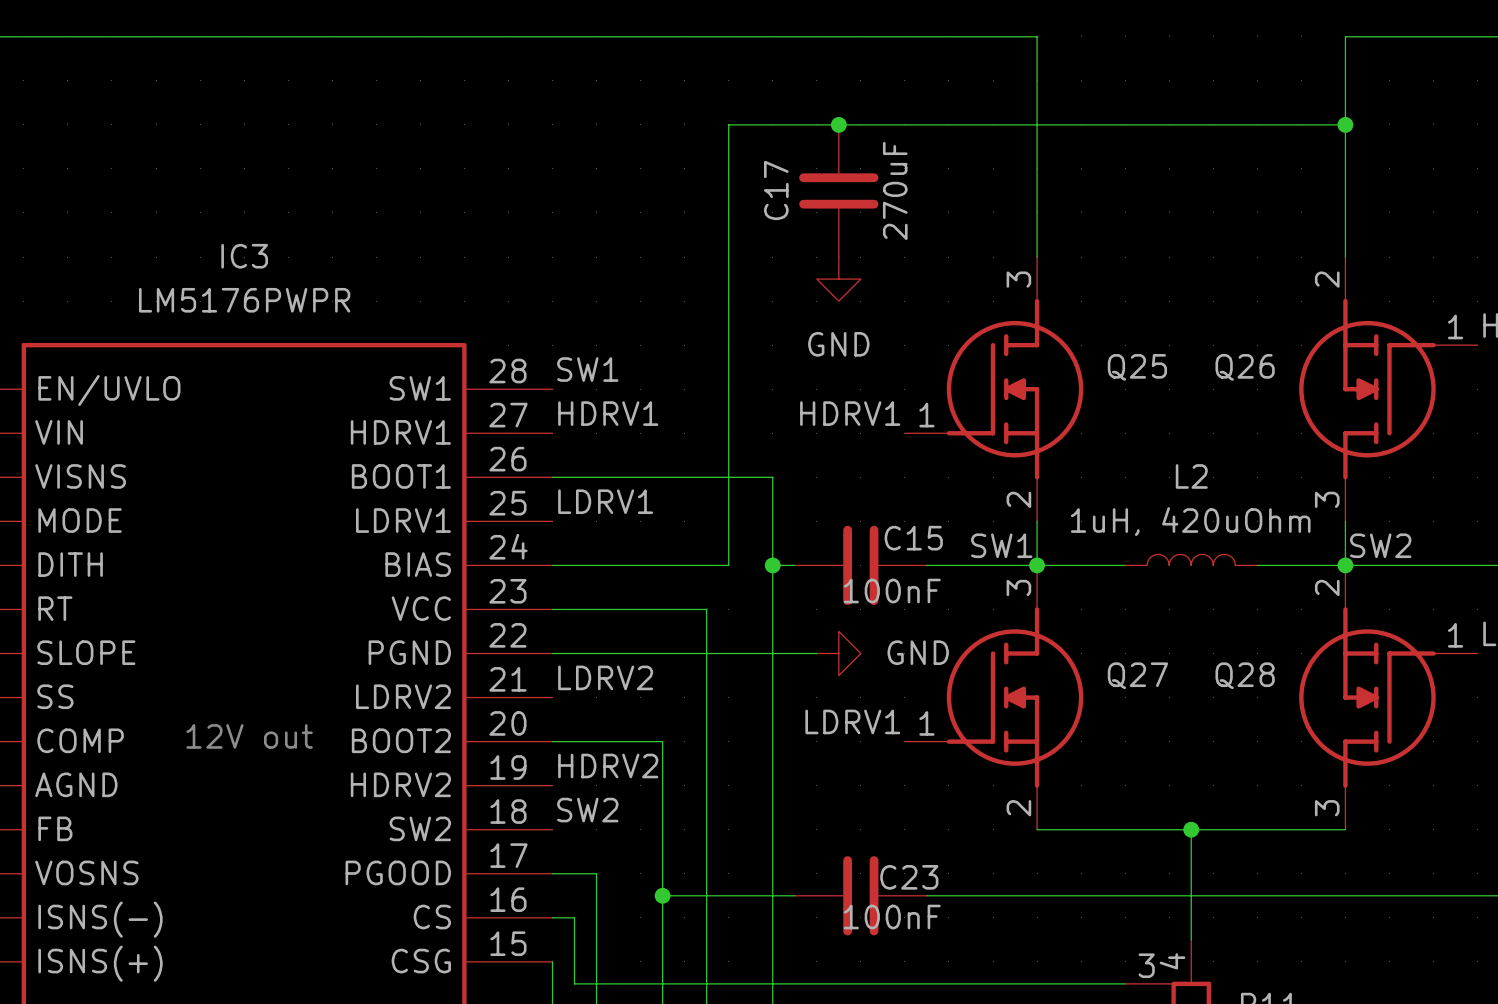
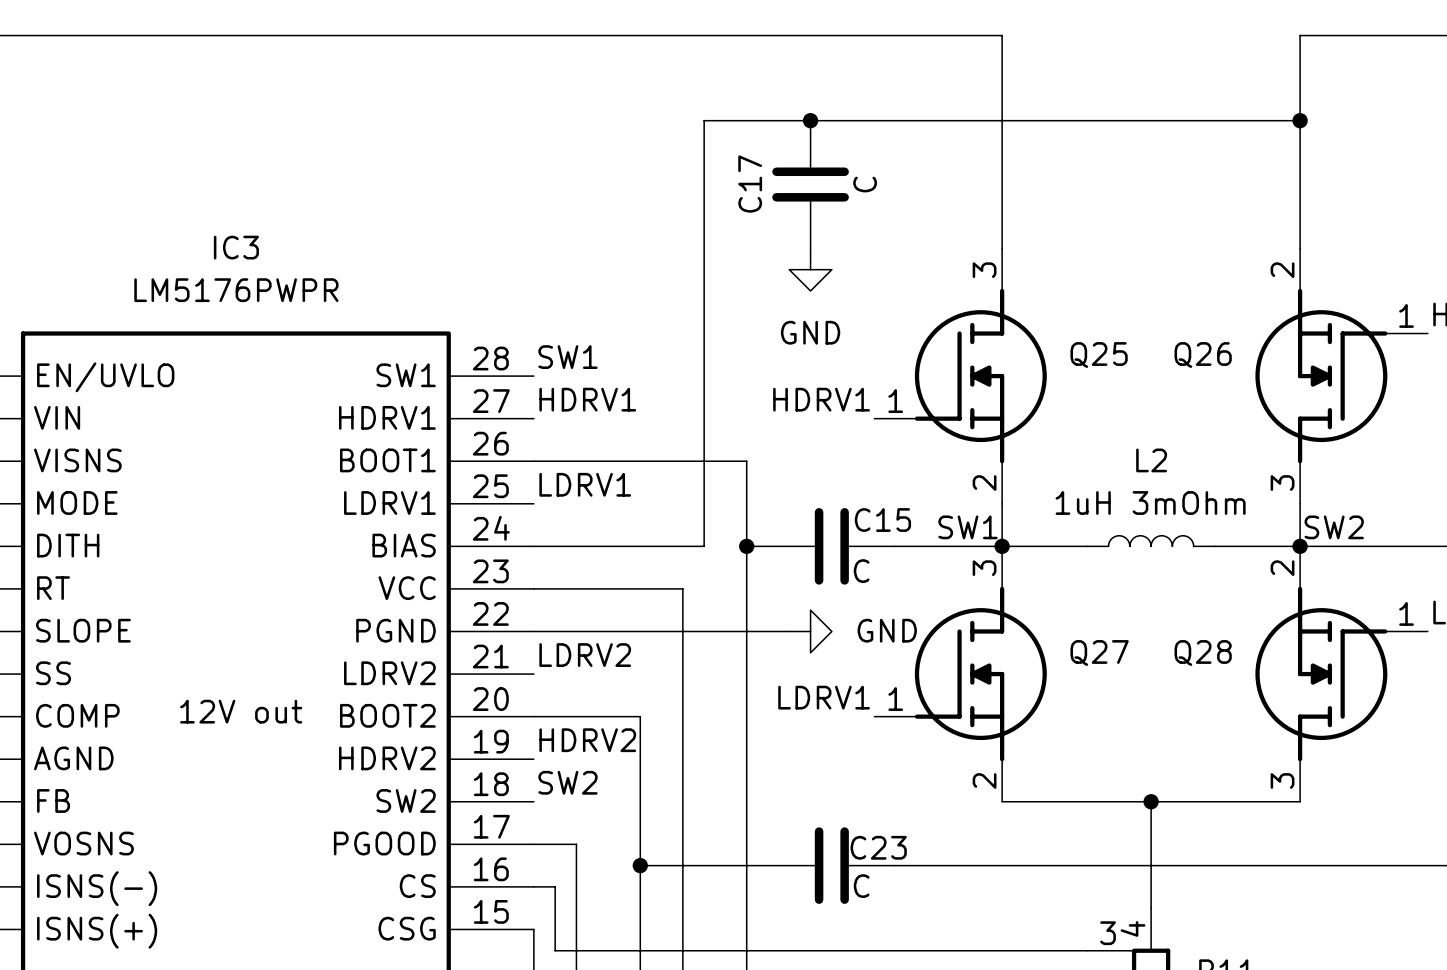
C17 value: 270uF (895, 190) -> C (865, 184)
L2 value: 1uH, 420uOhm (1190, 521) -> 1uH 3mOhm (1150, 502)
C15 value: 100nF (892, 591) -> C (861, 571)
C23 value: 100nF (892, 917) -> C (861, 886)

